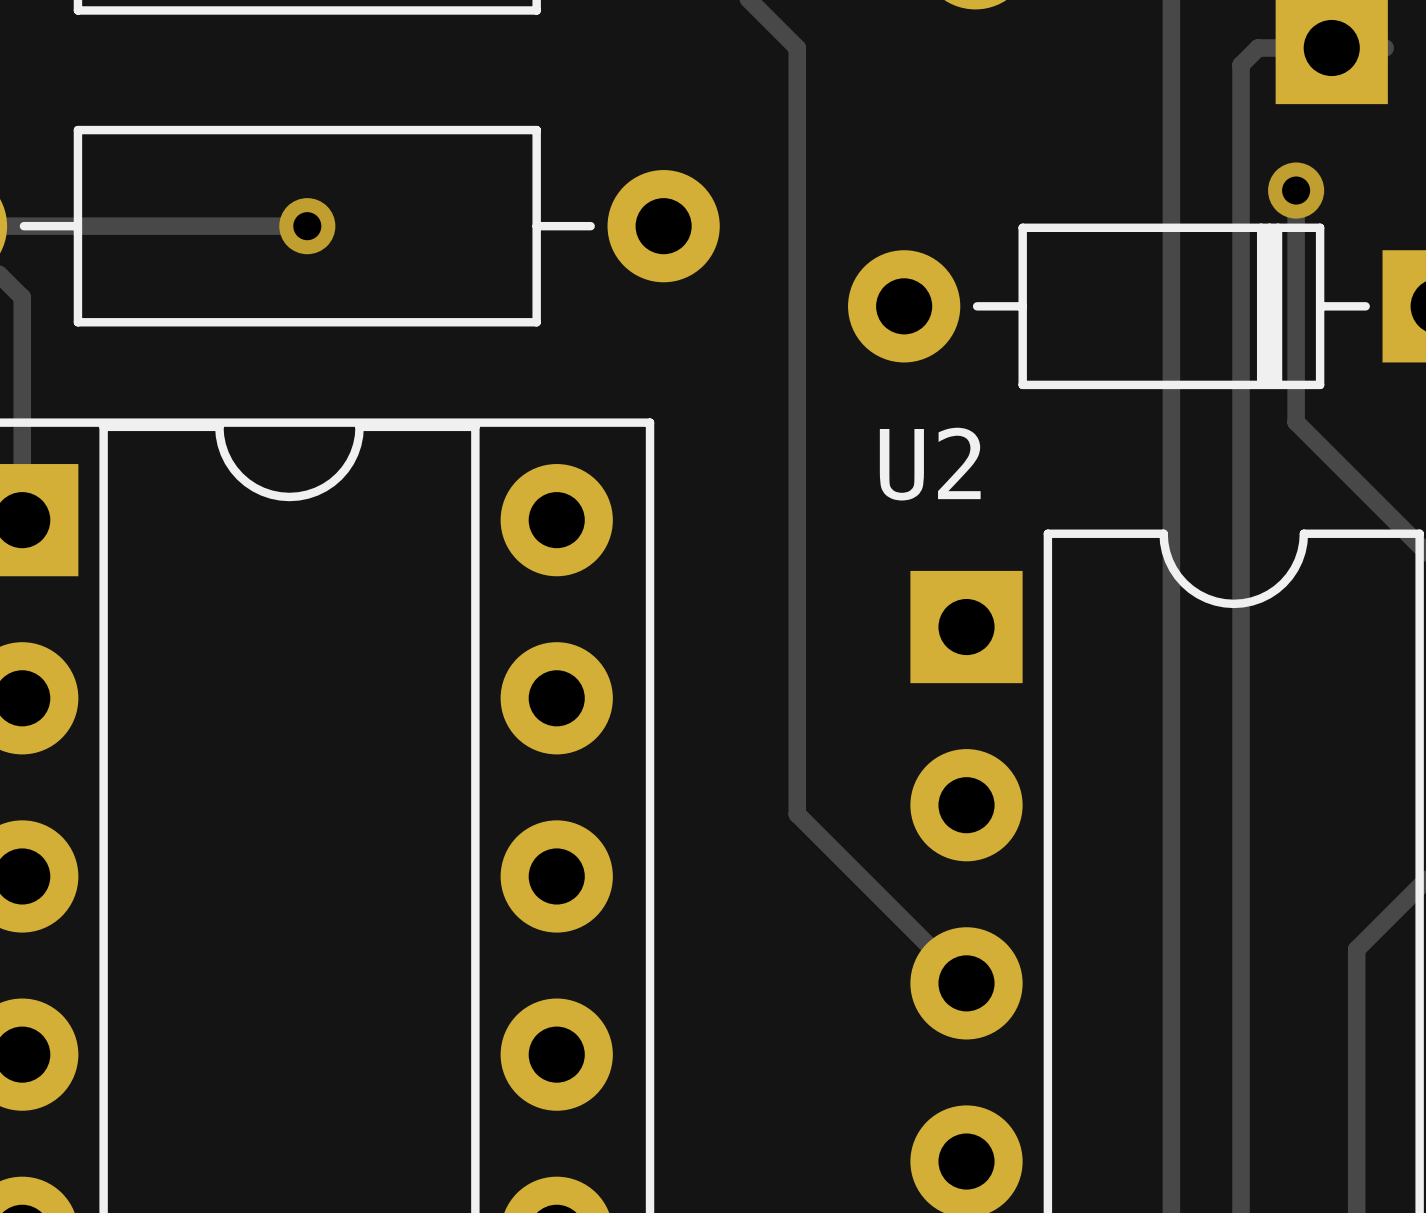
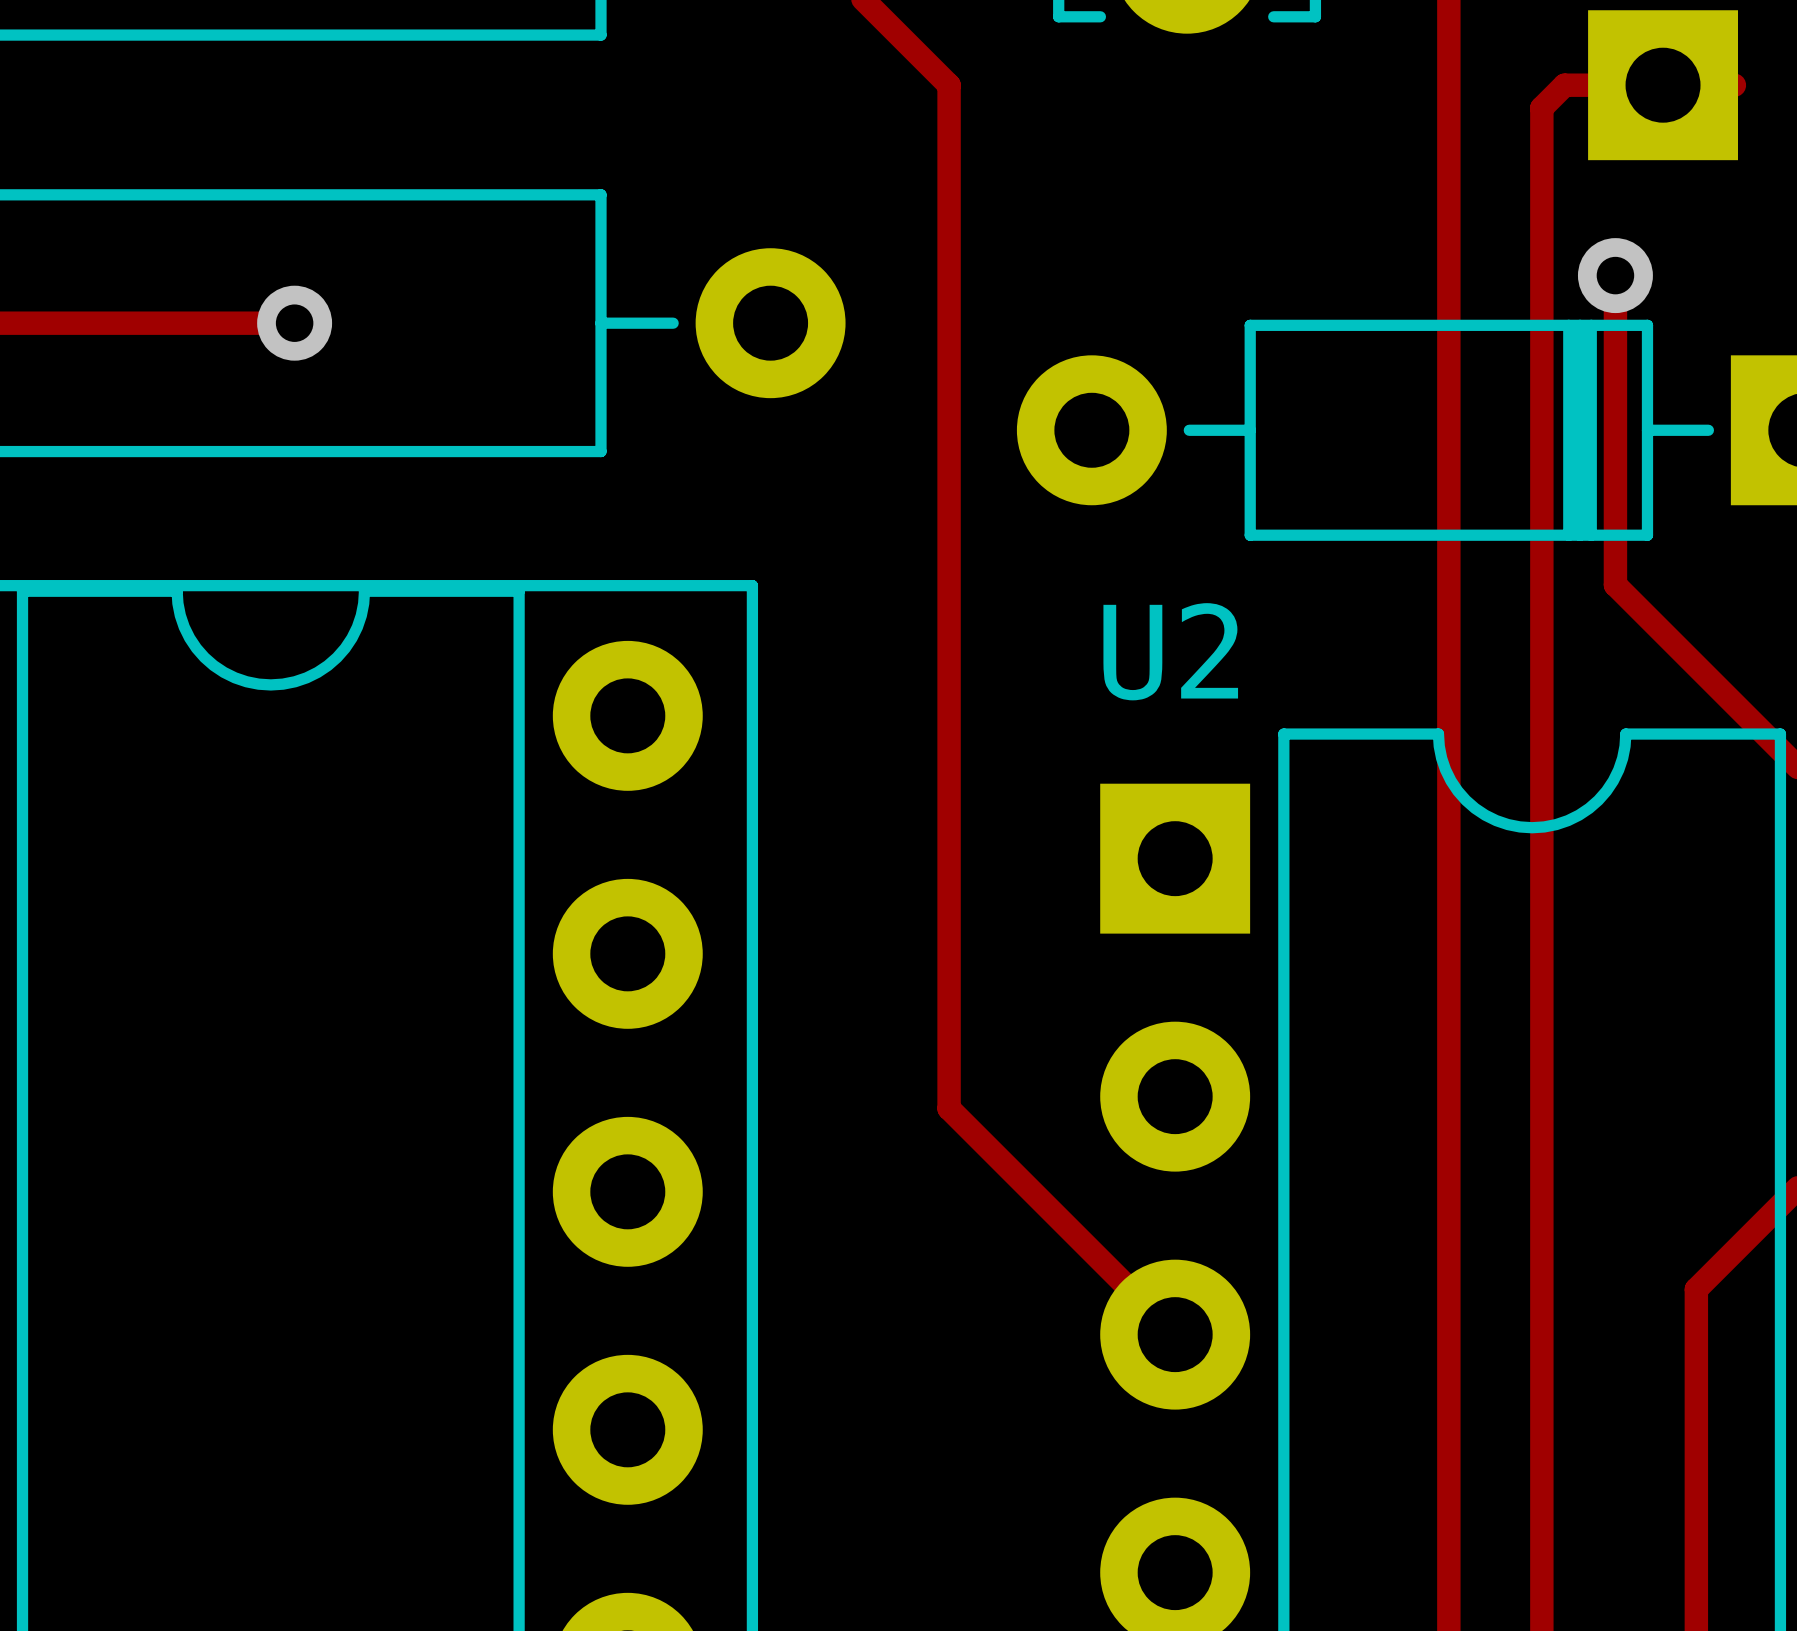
U2 name position: U2 (930, 464) -> U2 (1170, 651)

